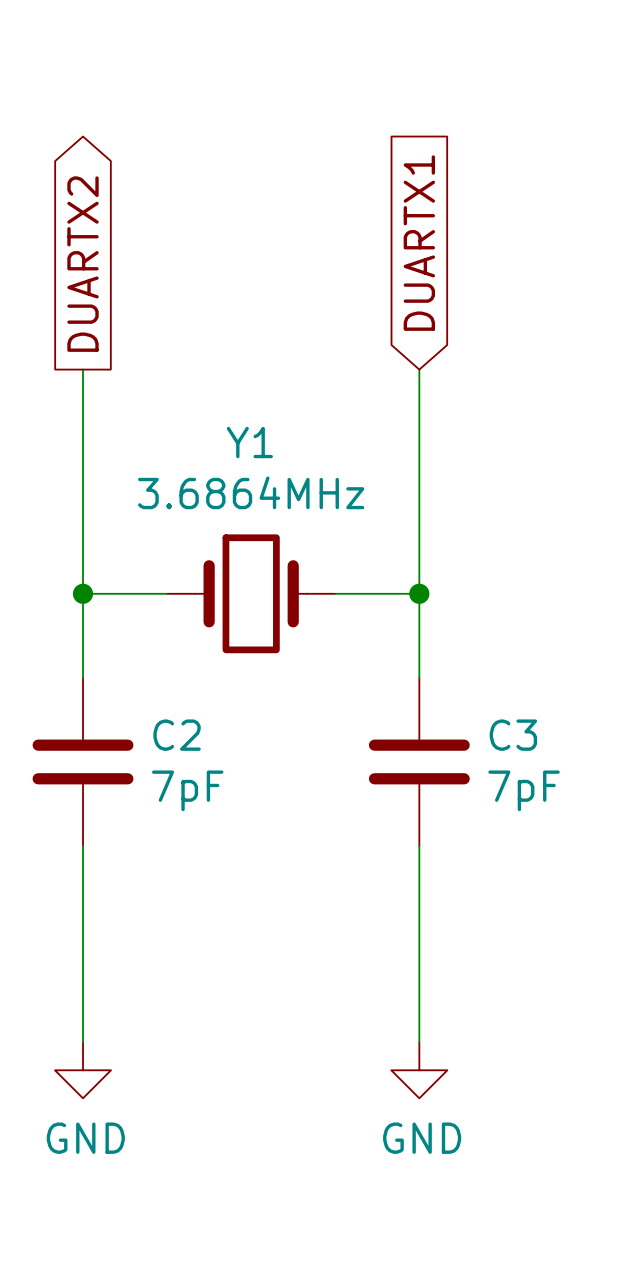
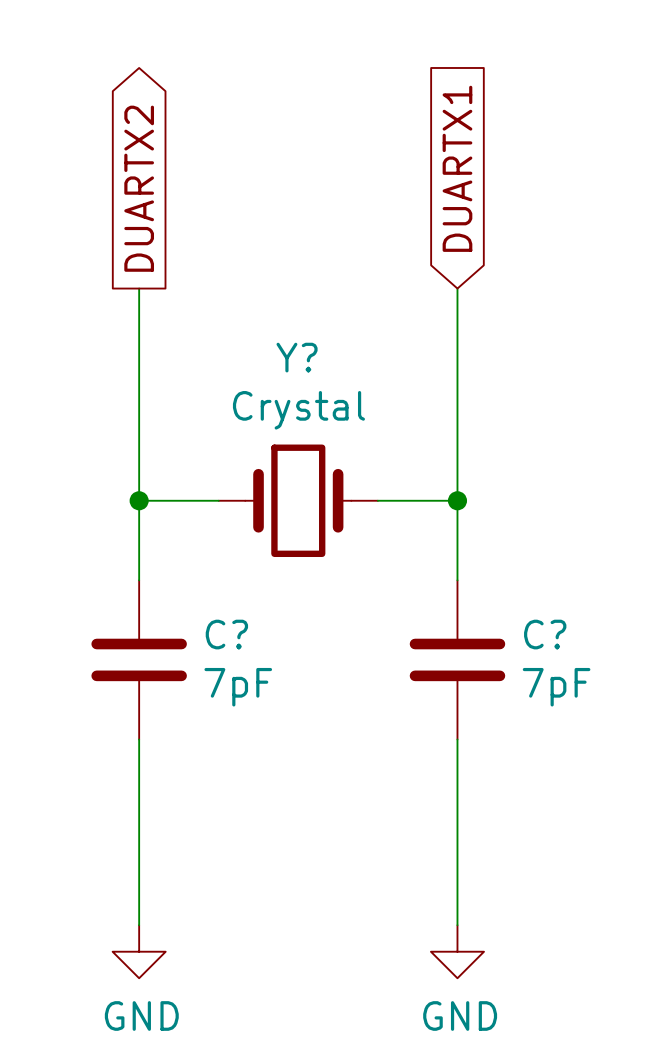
Y1 name: Y1 (249, 442) -> Y? (297, 357)
Y1 value: 3.6864MHz (251, 492) -> Crystal (298, 410)
C2 name: C2 (177, 735) -> C? (226, 634)
C3 name: C3 (513, 735) -> C? (545, 634)

